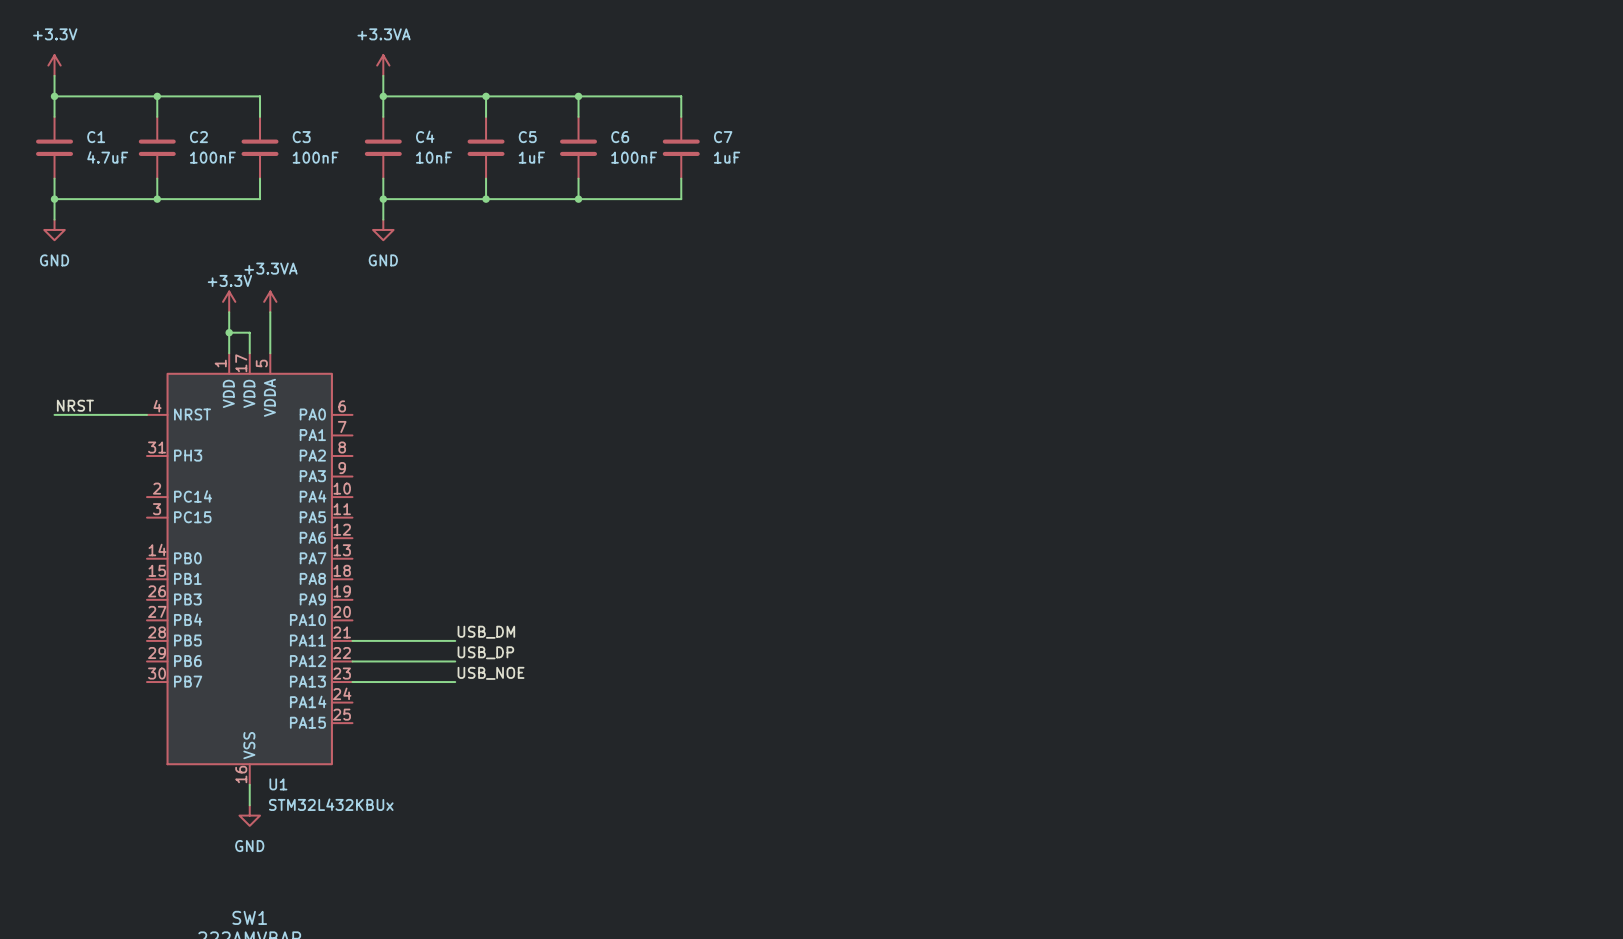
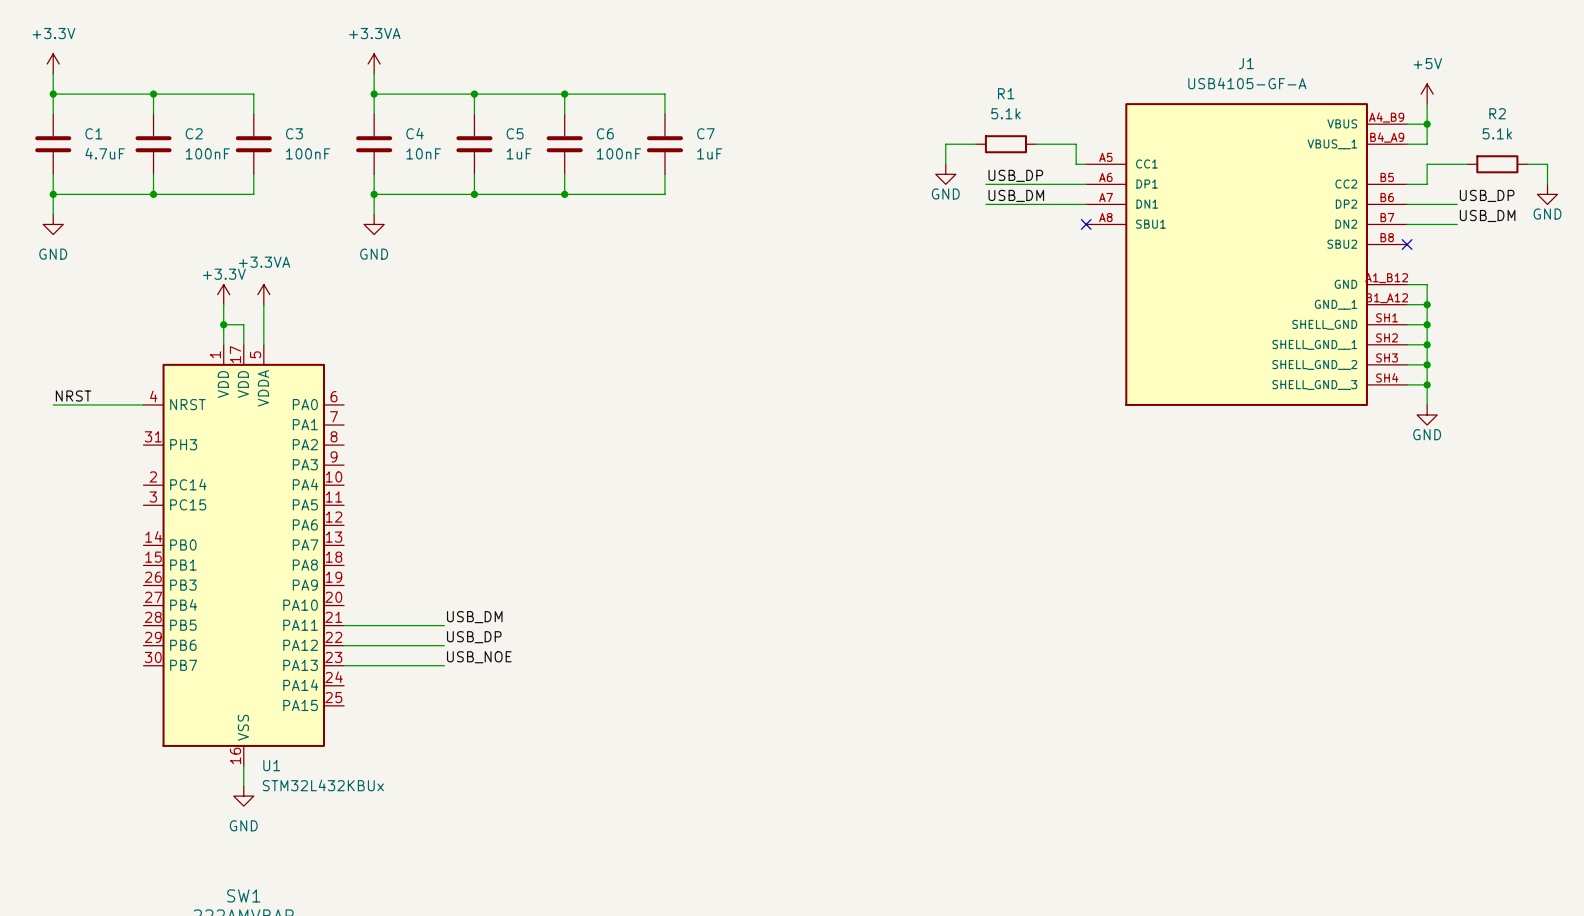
power symbol: none -> +5V (1427, 94)
wire: none -> (1427, 104) (1427, 144) (1407, 144)
wire: none -> (1407, 124) (1427, 124)
junction: none -> (1427, 124)
wire: none -> (975, 144) (945, 144) (945, 164)
R1: none -> 5.1k (1005, 144)
wire: none -> (1036, 144) (1076, 144) (1076, 164) (1086, 164)
wire: none -> (1467, 164) (1427, 164) (1427, 184) (1407, 184)
R2: none -> 5.1k (1497, 164)
wire: none -> (1527, 164) (1547, 164) (1547, 184)
power symbol: none -> GND (945, 174)
label: none -> USB_DP (1015, 175)
wire: none -> (985, 184) (1086, 184)
power symbol: none -> GND (1547, 194)
label: none -> USB_DM (1016, 195)
label: none -> USB_DP (1487, 195)
wire: none -> (985, 204) (1086, 204)
wire: none -> (1407, 204) (1457, 204)
label: none -> USB_DM (1487, 215)
no-connect mark: none -> (1086, 224)
wire: none -> (1407, 224) (1457, 224)
no-connect mark: none -> (1407, 244)
J1: none -> USB4105-GF-A (1246, 254)
wire: none -> (1407, 284) (1427, 284) (1427, 404)
wire: none -> (1407, 304) (1427, 304)
junction: none -> (1427, 304)
wire: none -> (1407, 324) (1427, 324)
junction: none -> (1427, 324)
wire: none -> (1407, 344) (1427, 344)
junction: none -> (1427, 344)
wire: none -> (1407, 364) (1427, 364)
junction: none -> (1427, 364)
wire: none -> (1407, 384) (1427, 384)
junction: none -> (1427, 384)
power symbol: none -> GND (1427, 415)

